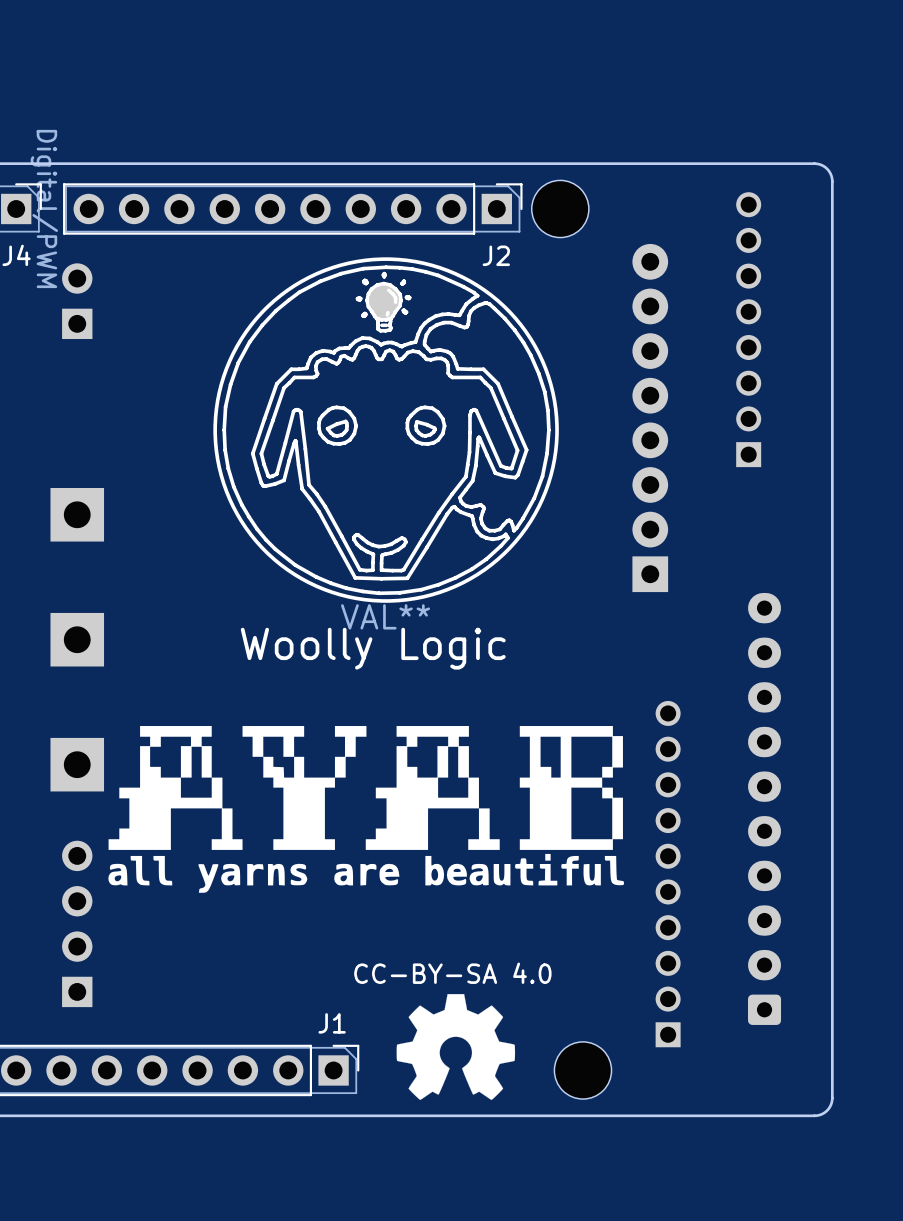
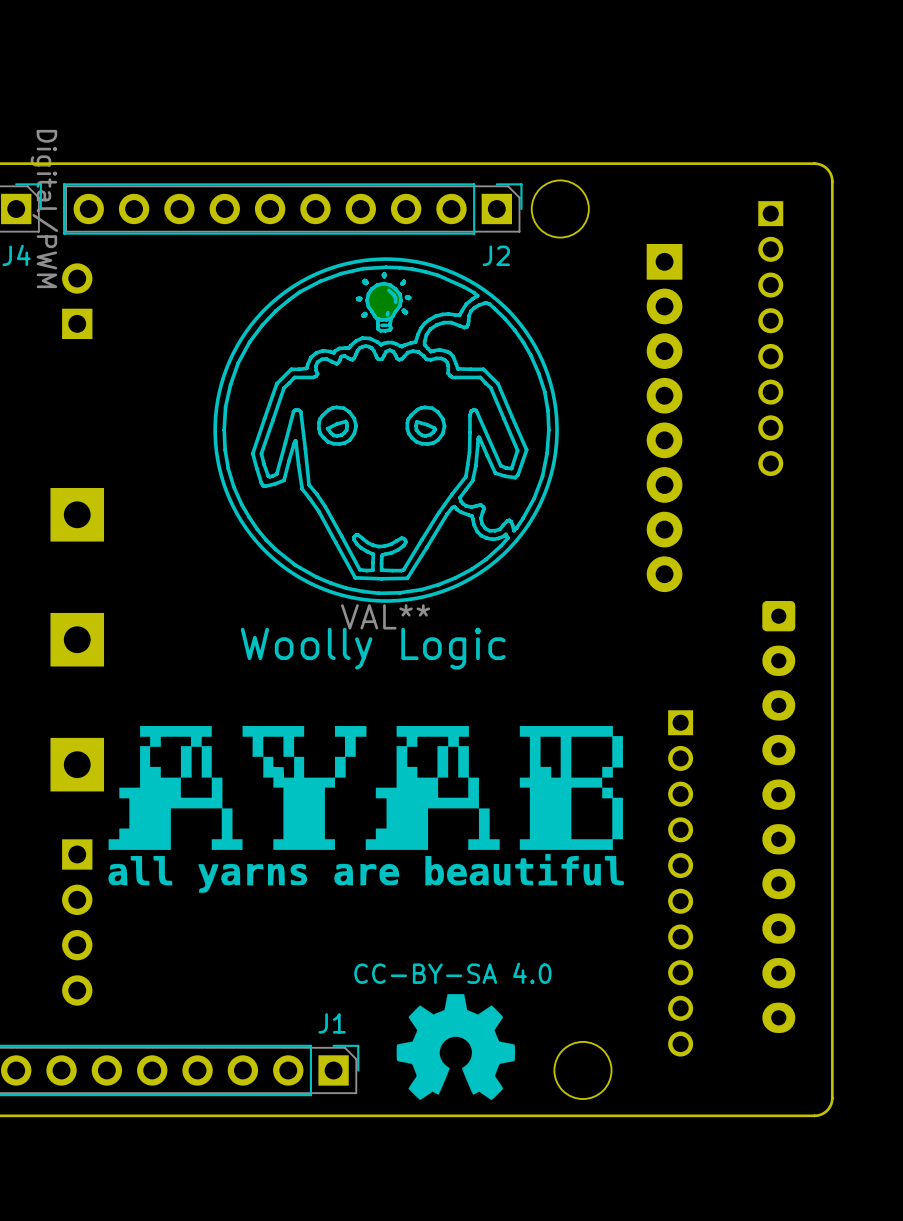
part rotation: 0° (748, 329) -> 180° (770, 338)
part rotation: 0° (650, 418) -> 180° (664, 418)
part rotation: 0° (764, 808) -> 180° (778, 816)
part rotation: 0° (668, 874) -> 180° (680, 883)
part rotation: 0° (77, 923) -> 180° (77, 922)

